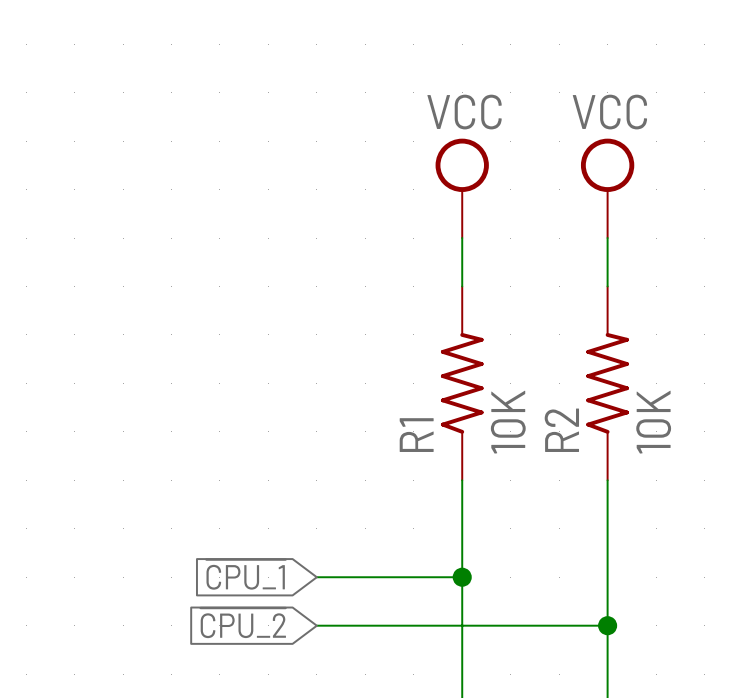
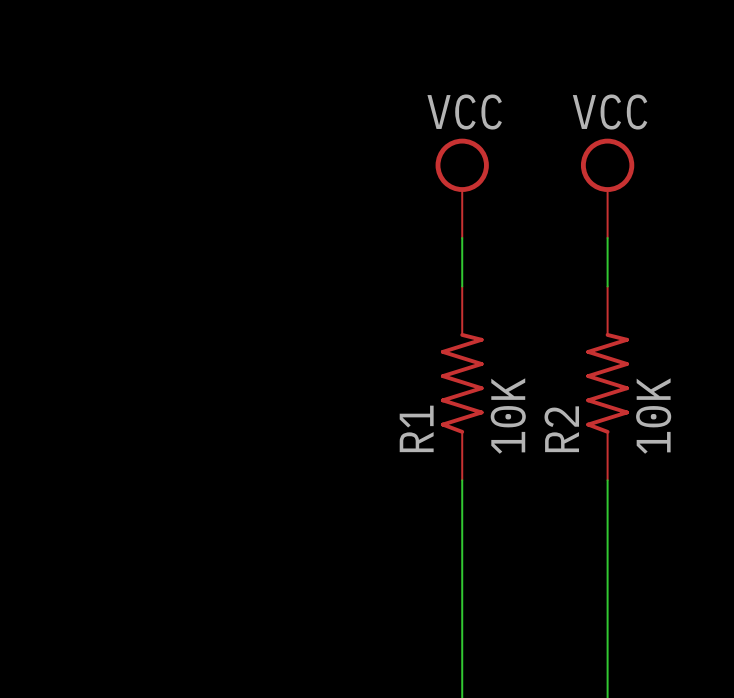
global label: ~{CPU_1} (246, 574) -> none
wire: (316, 577) (462, 577) -> none
junction: (462, 577) -> none
global label: ~{CPU_2} (243, 623) -> none
wire: (316, 625) (607, 625) -> none
junction: (607, 625) -> none

